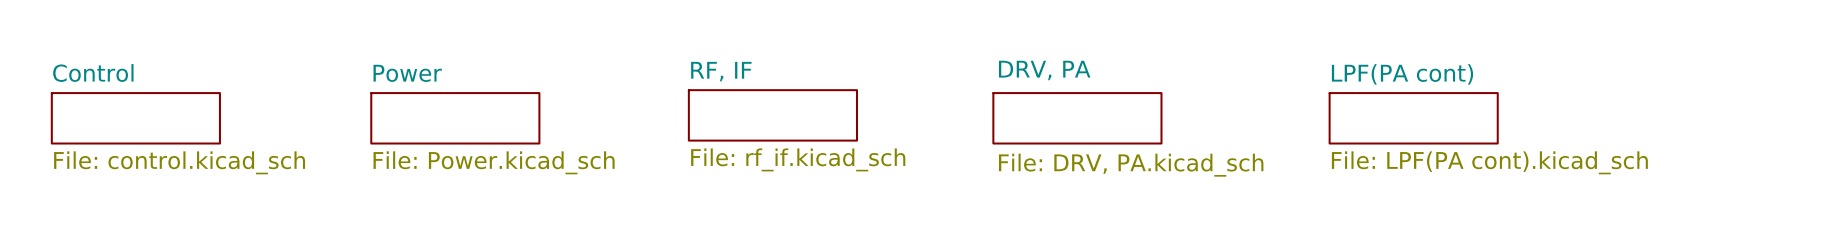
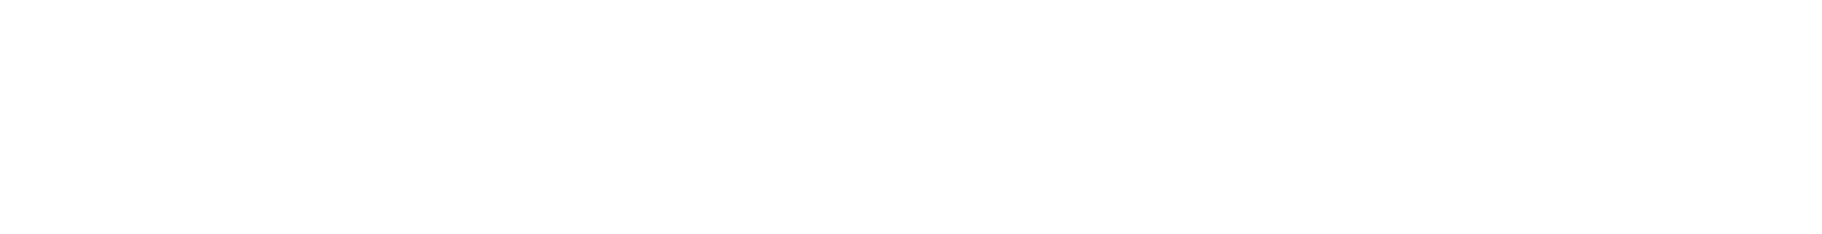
sheet RF, IF: File: rf_if.kicad_sch (772, 115) -> none
sheet Control: File: control.kicad_sch (135, 118) -> none
sheet Power: File: Power.kicad_sch (455, 118) -> none
sheet DRV, PA: File: DRV, PA.kicad_sch (1077, 118) -> none
sheet LPF(PA cont): File: LPF(PA cont).kicad_sch (1413, 118) -> none

